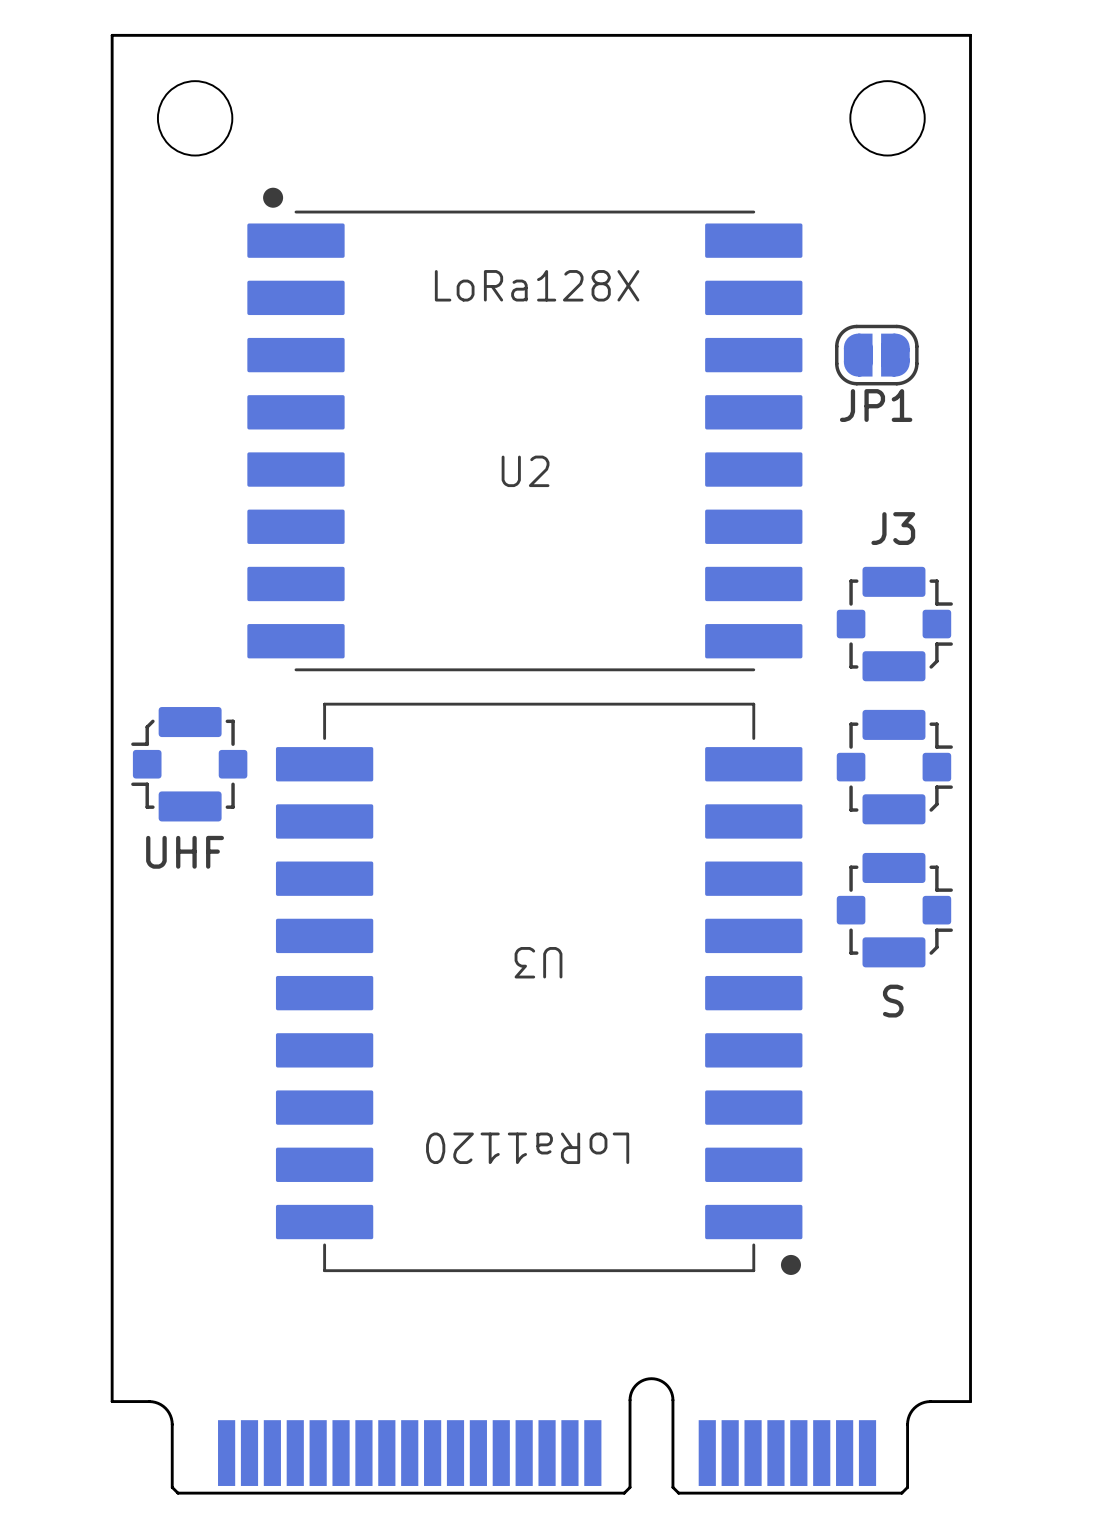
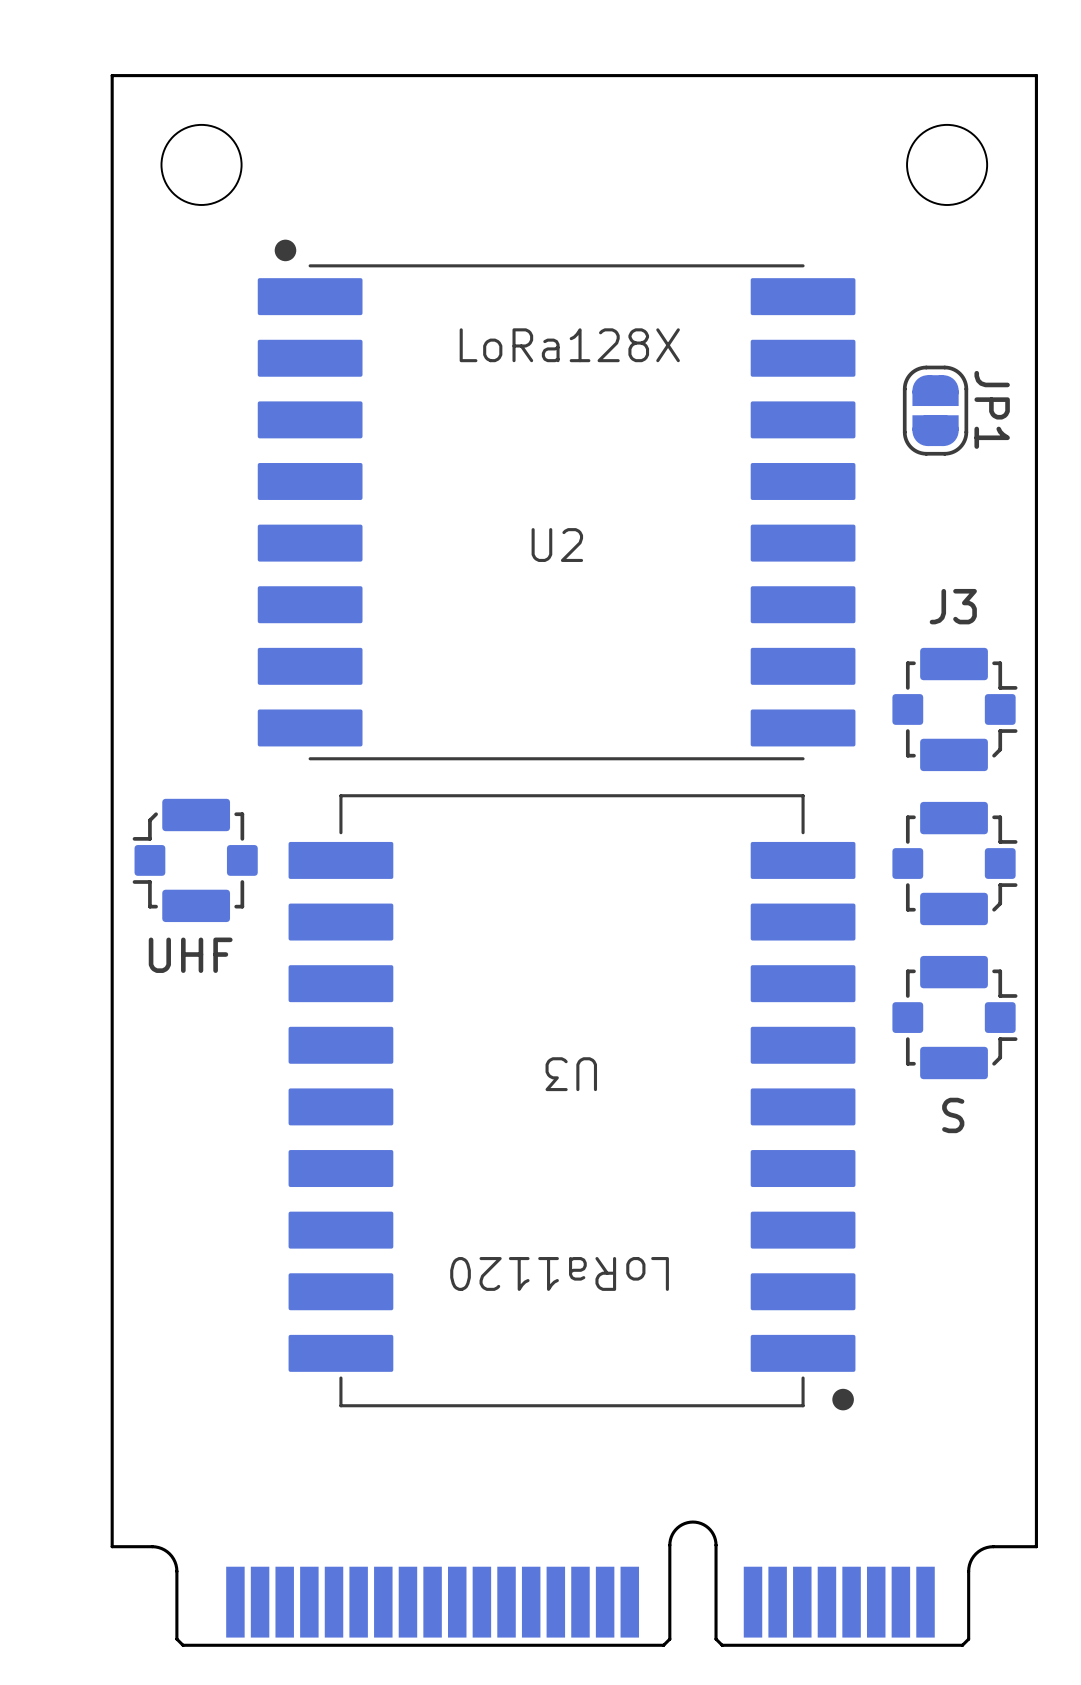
JP1 rotation: 0° (876, 355) -> 90° clockwise (935, 410)
JP1 name position: JP1 (876, 405) -> JP1 (992, 409)

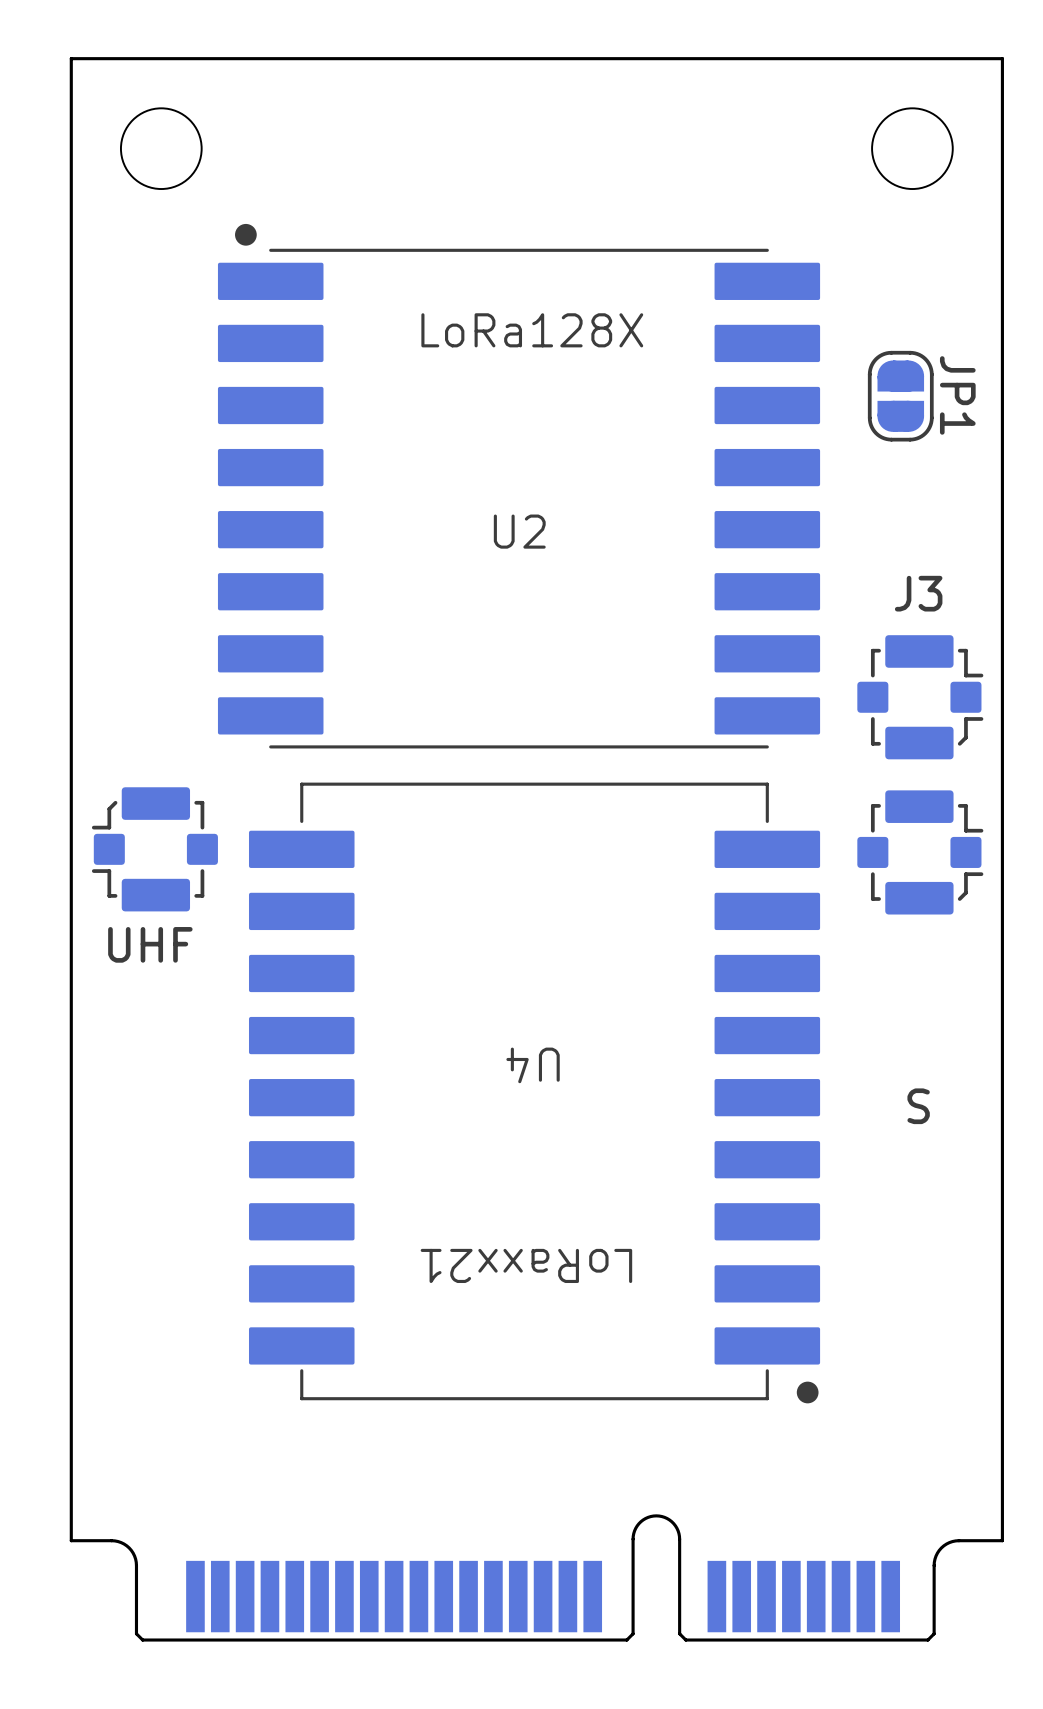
part: (954, 1017) -> none
U3 name: U3 (571, 1074) -> U4 (533, 1065)
U3 text: LoRa1120 (559, 1273) -> LoRaxx21 (526, 1265)

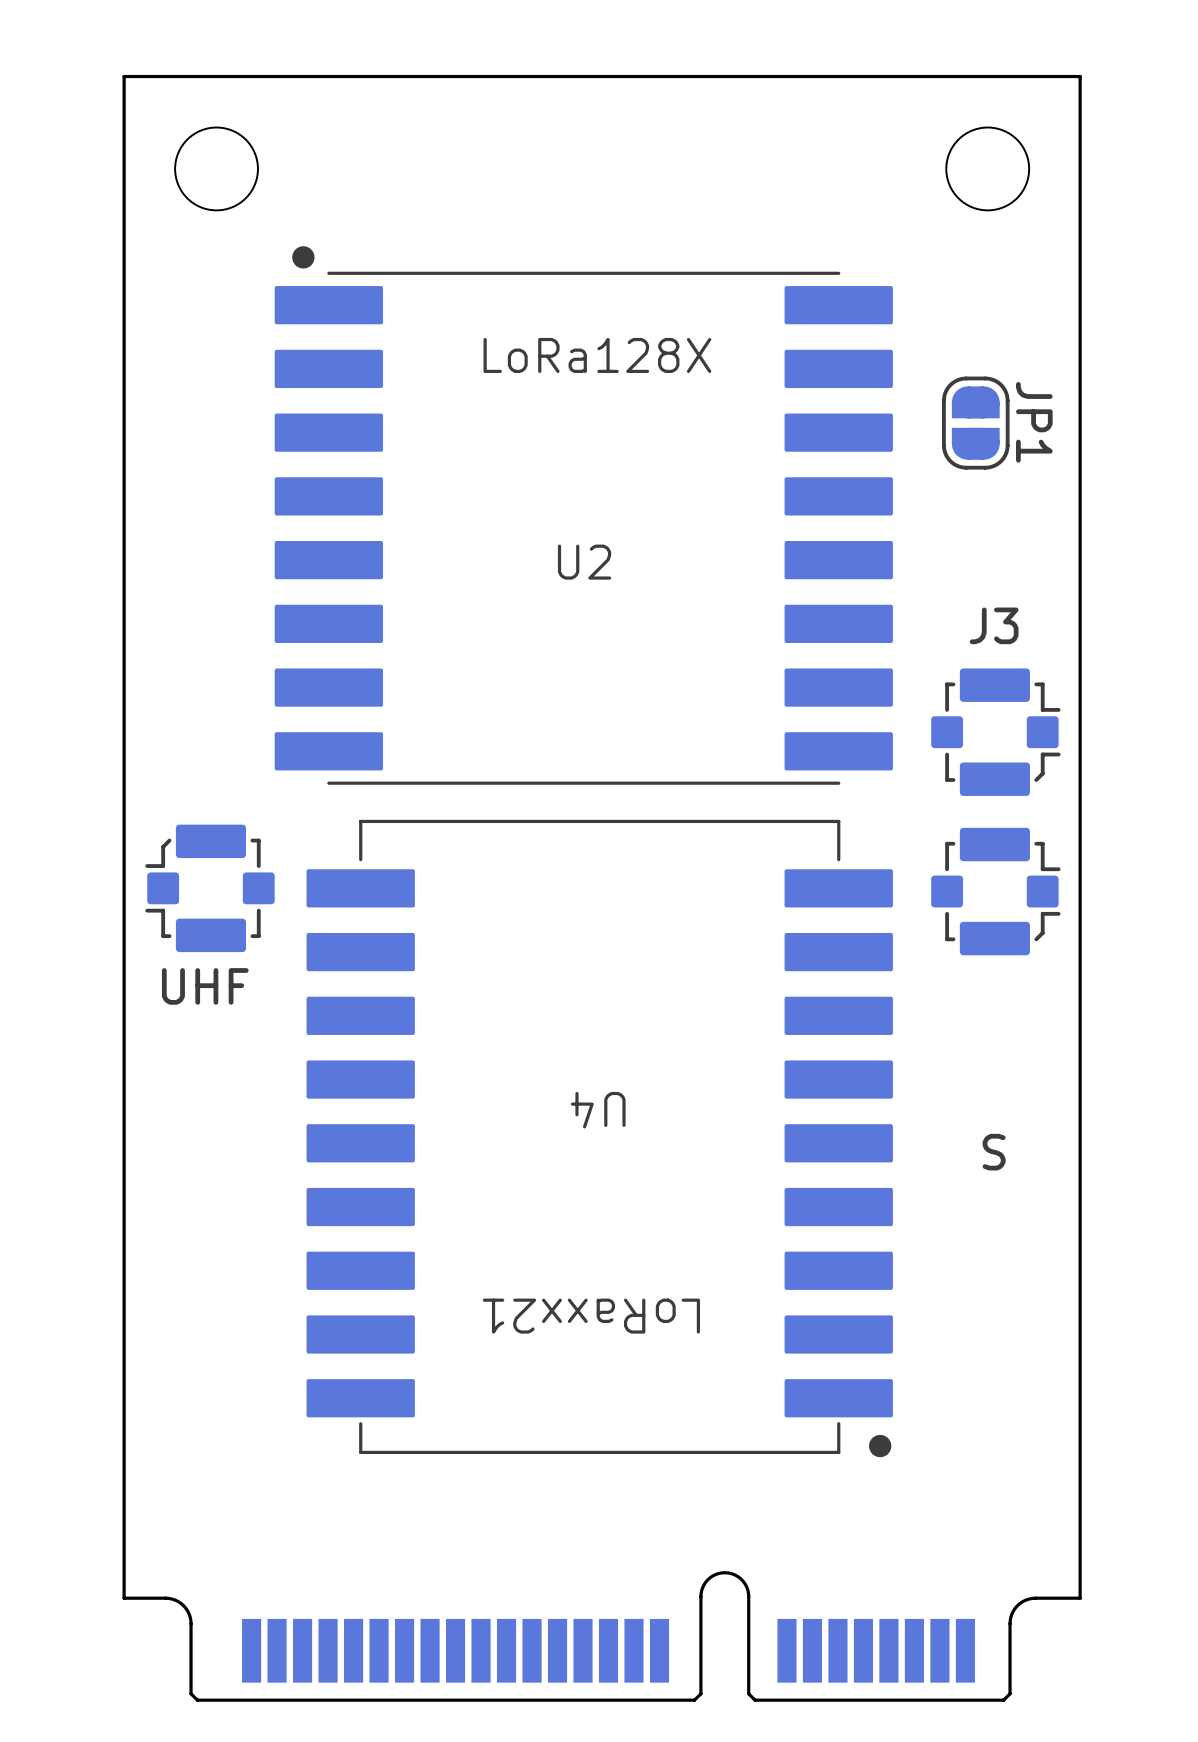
part footprint: [69, 57, 1004, 1642] -> [122, 74, 1082, 1702]

